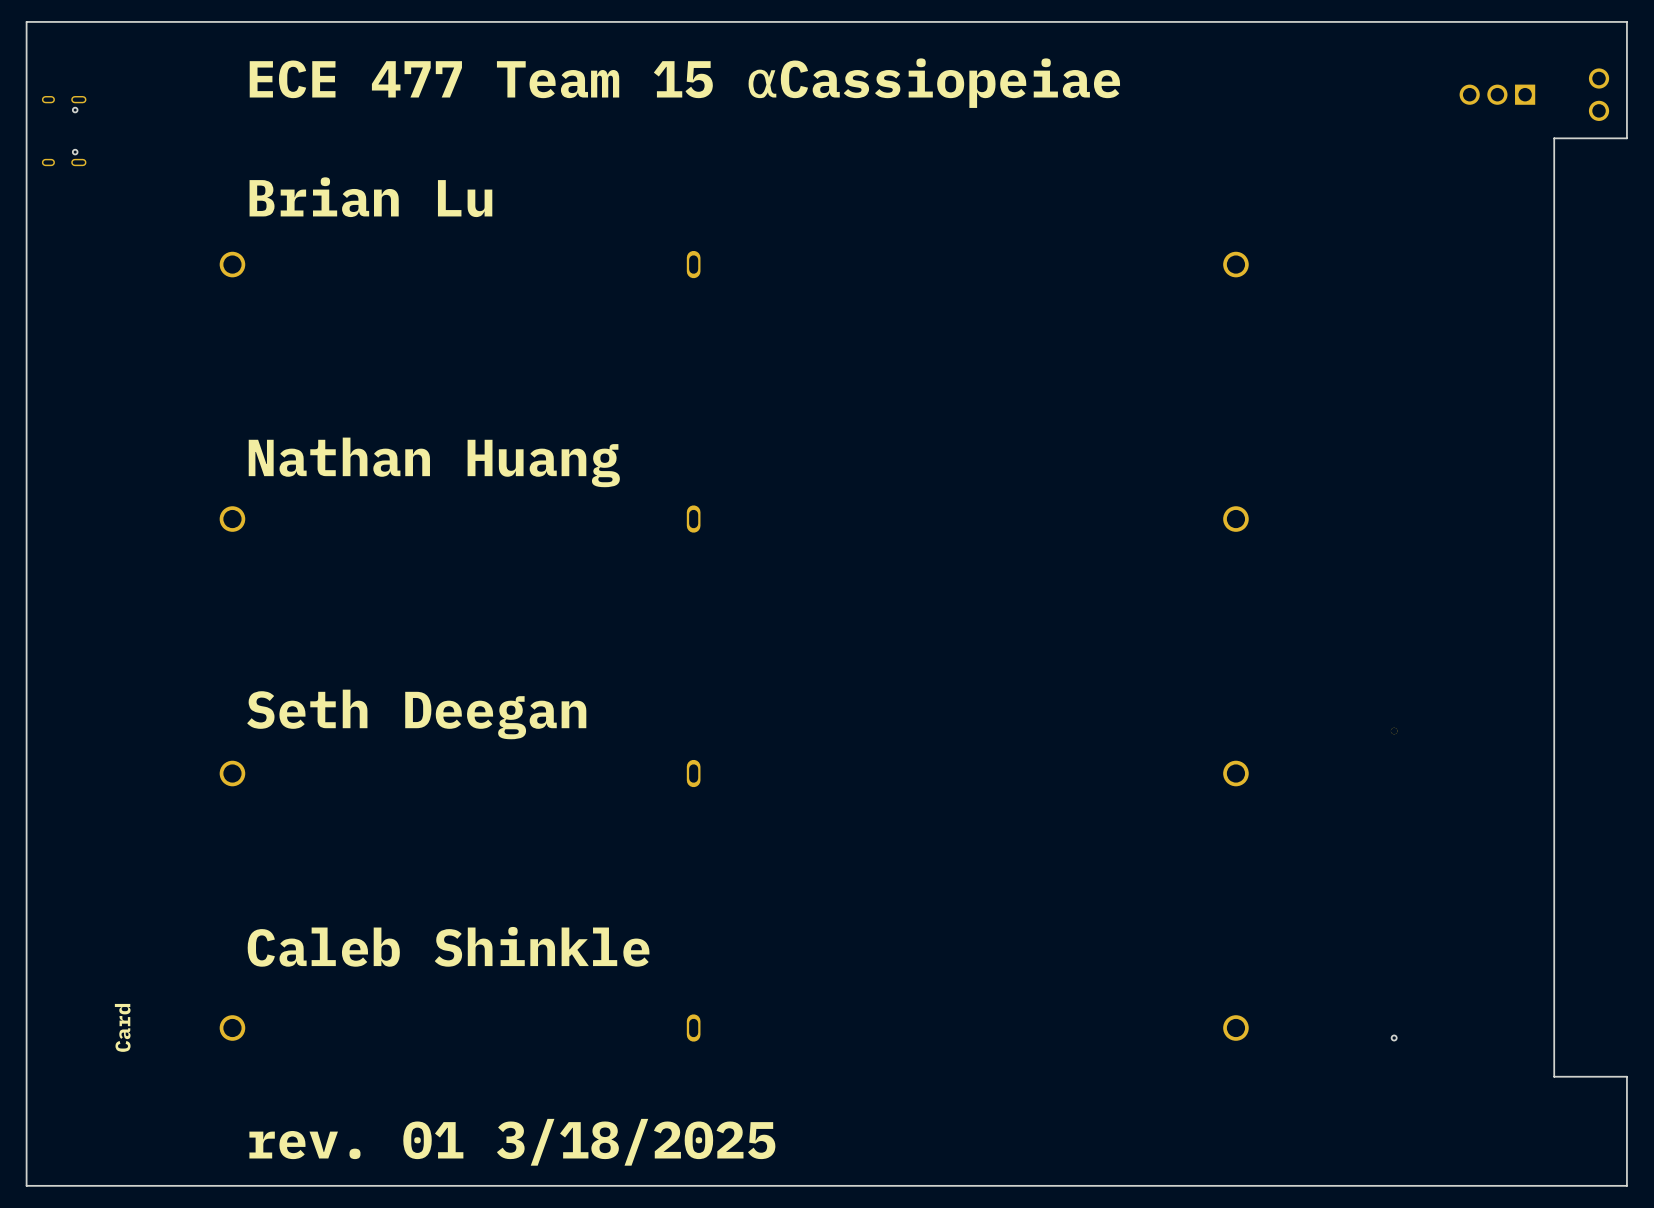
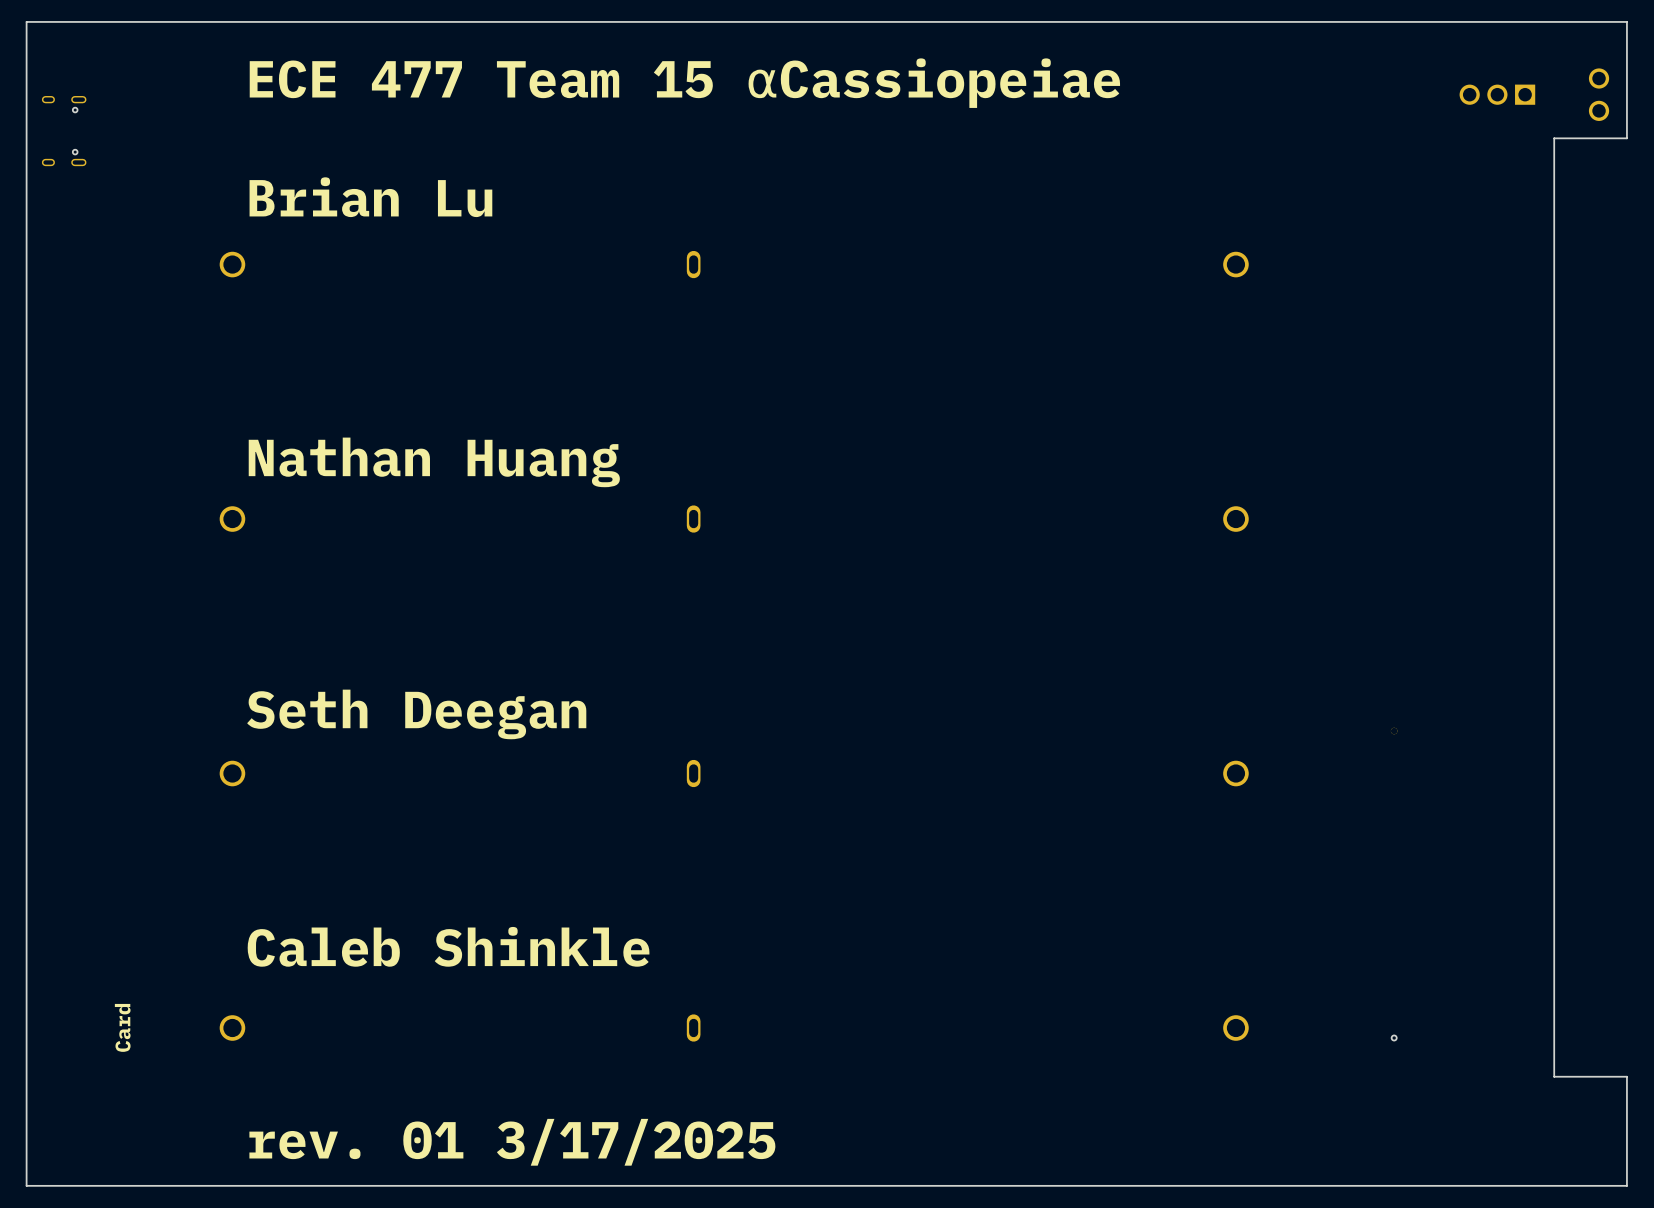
text: rev. 01 3/18/2025 (512, 1142) -> rev. 01 3/17/2025 (512, 1142)

